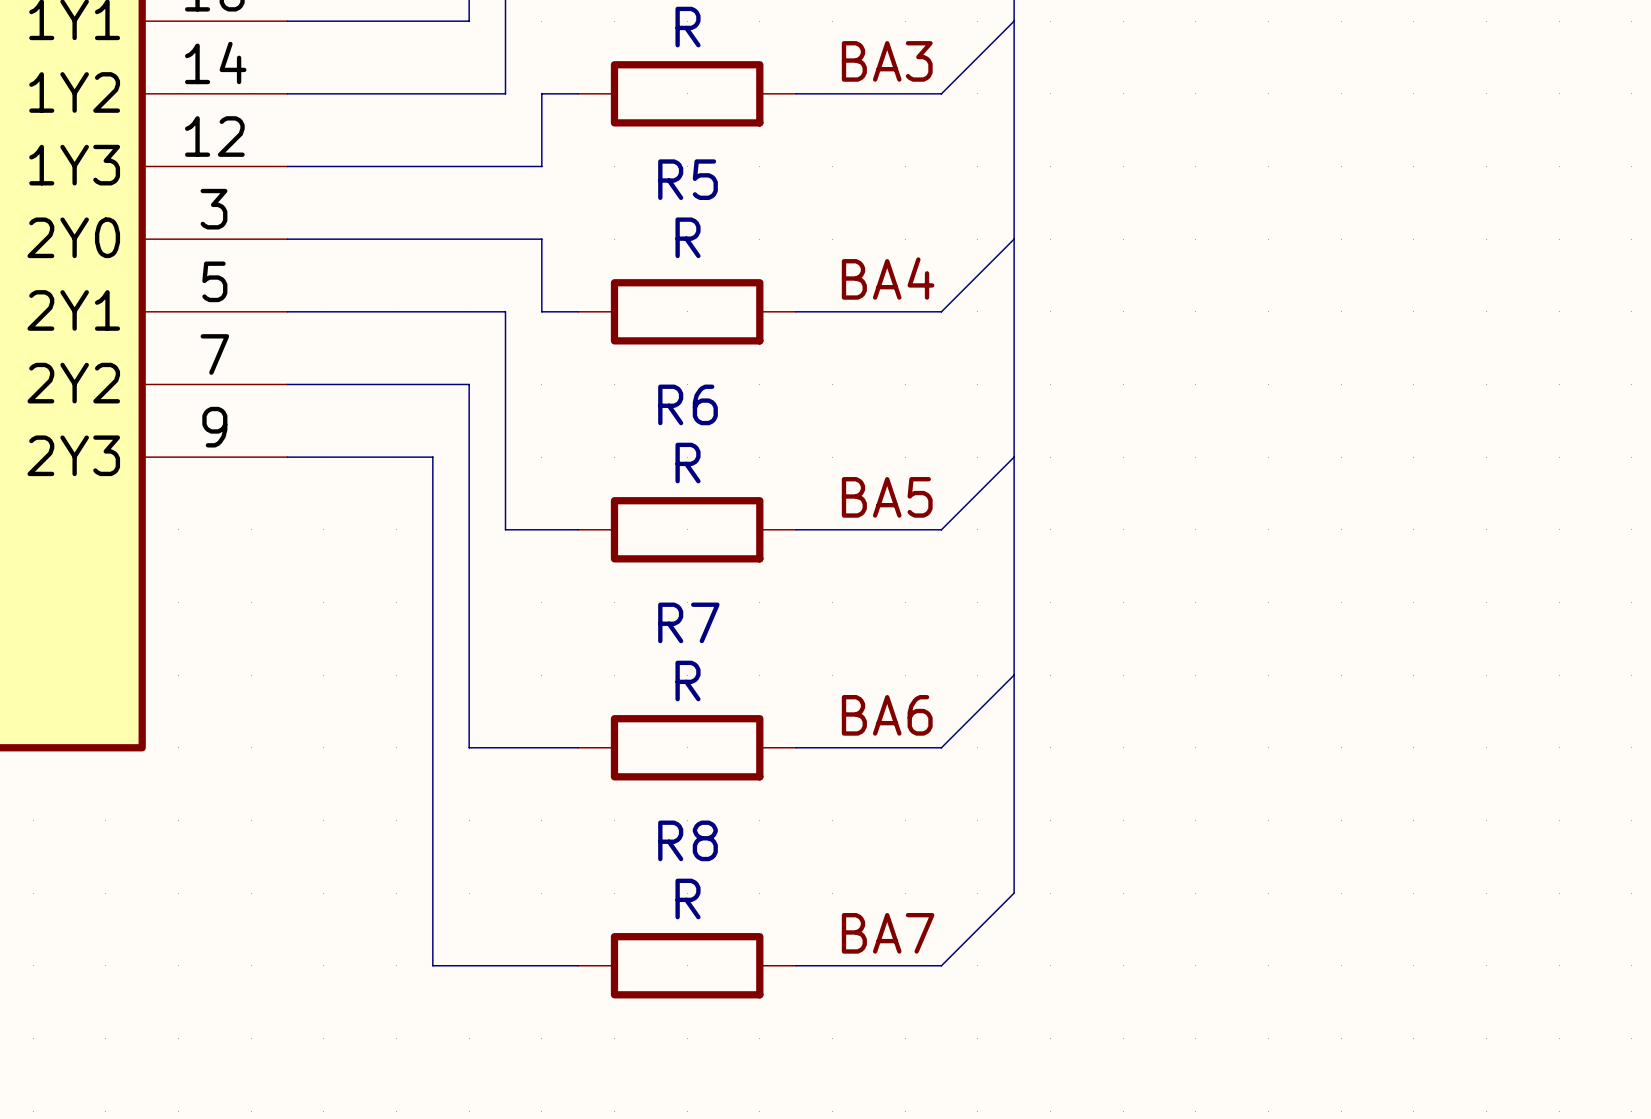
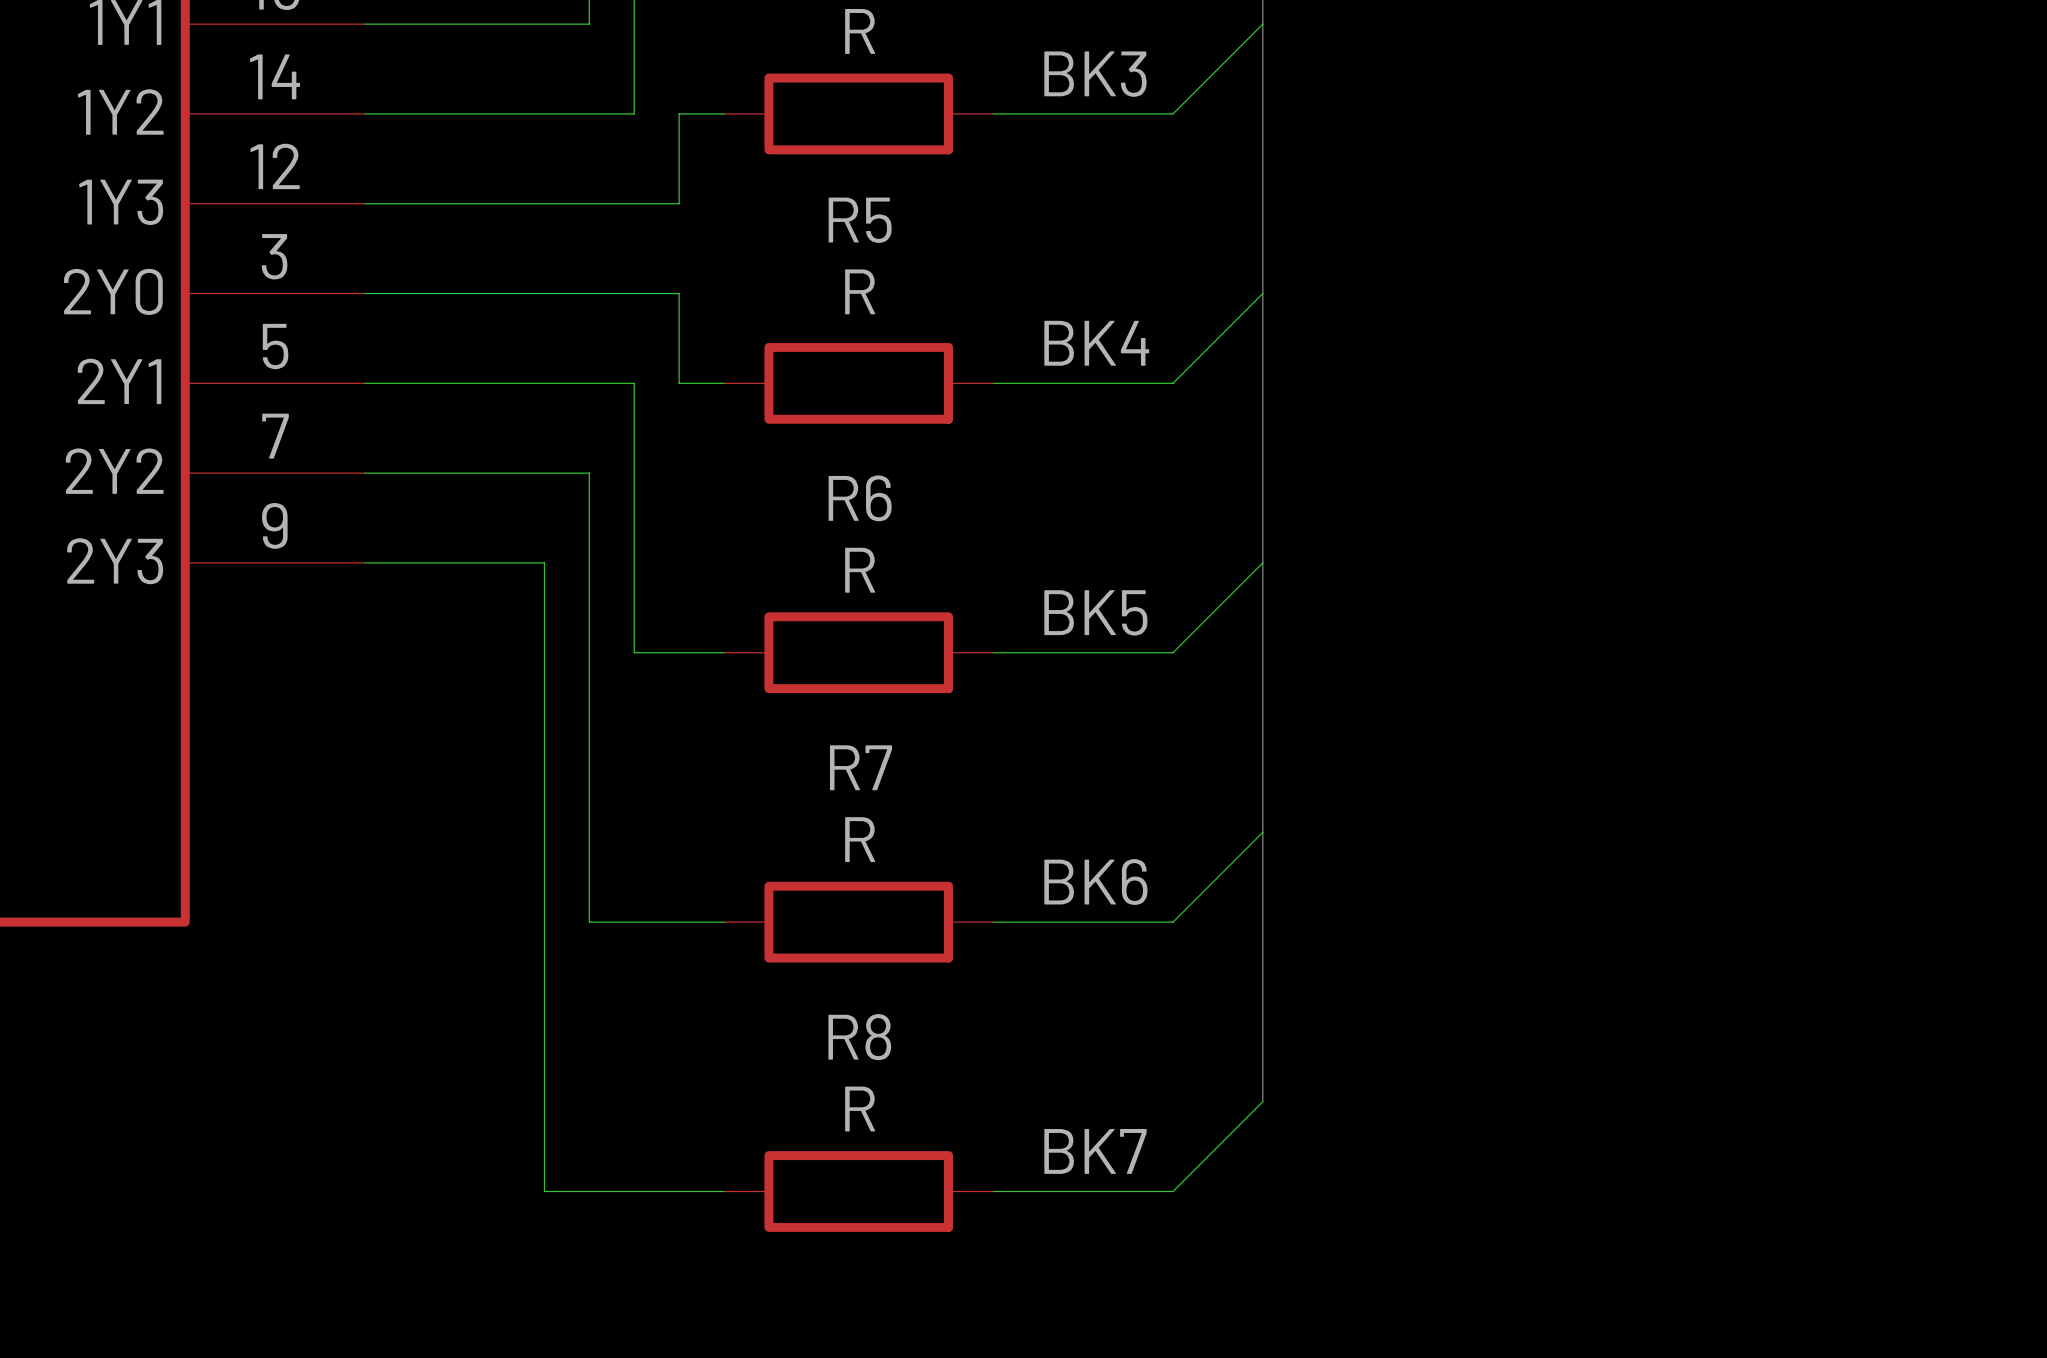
label: BA3 (887, 61) -> BK3 (1095, 74)
label: BA4 (888, 278) -> BK4 (1096, 343)
label: BA5 (887, 497) -> BK5 (1095, 612)
label: BA6 (887, 715) -> BK6 (1095, 882)
label: BA7 (888, 933) -> BK7 (1095, 1151)

